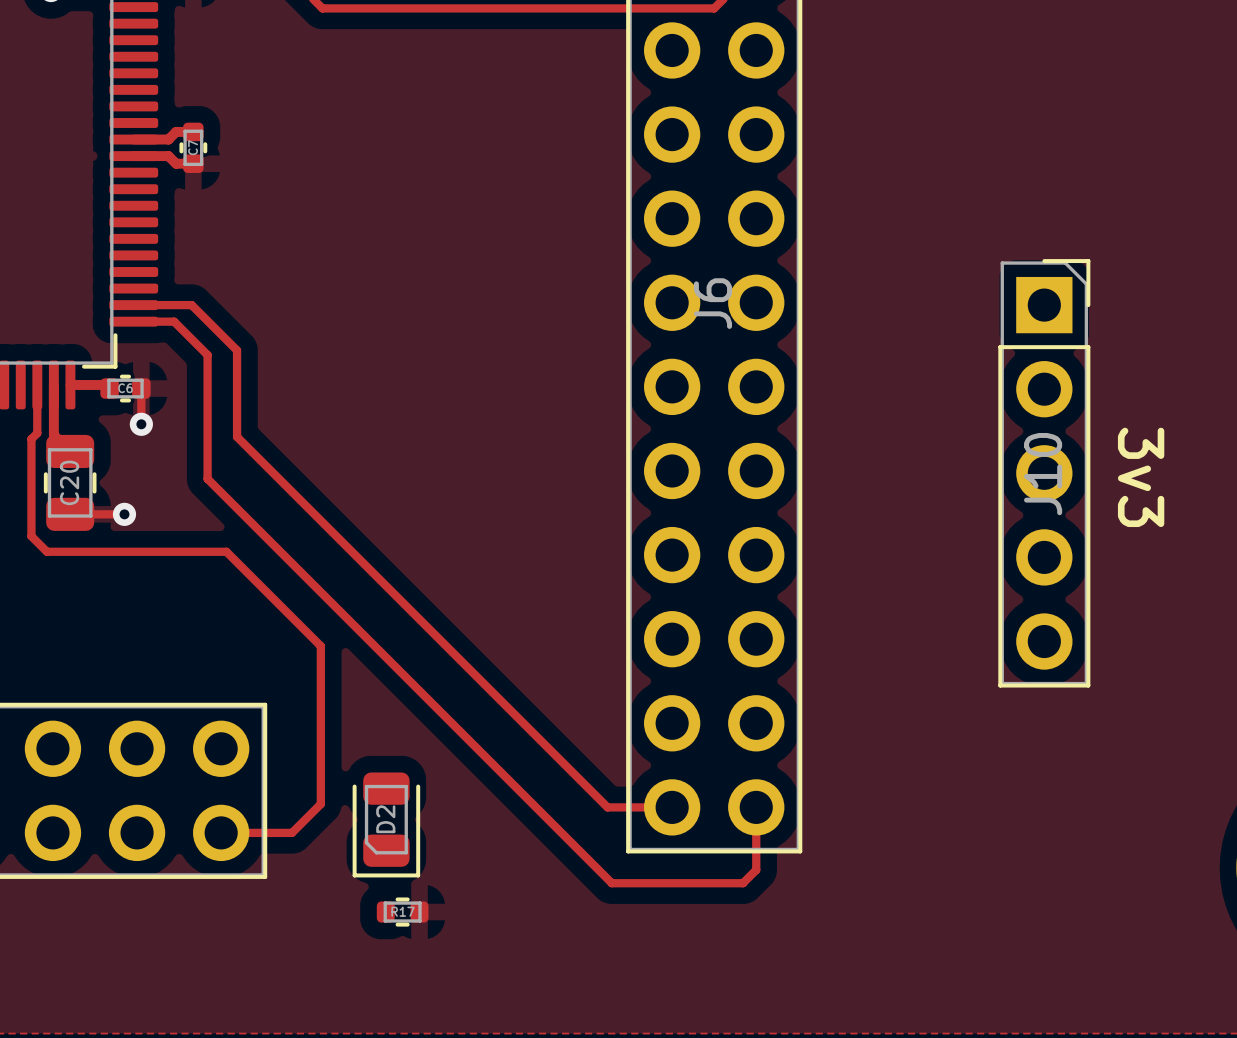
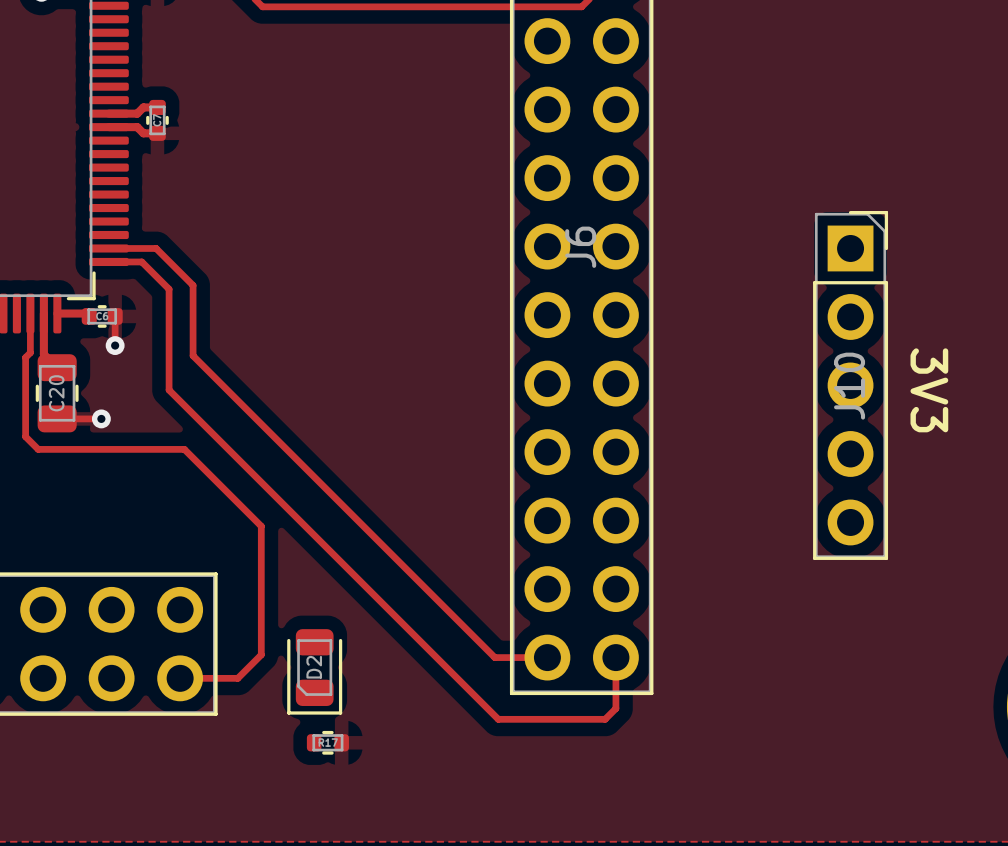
text: 3v3 (1141, 477) -> 3V3 (929, 390)

